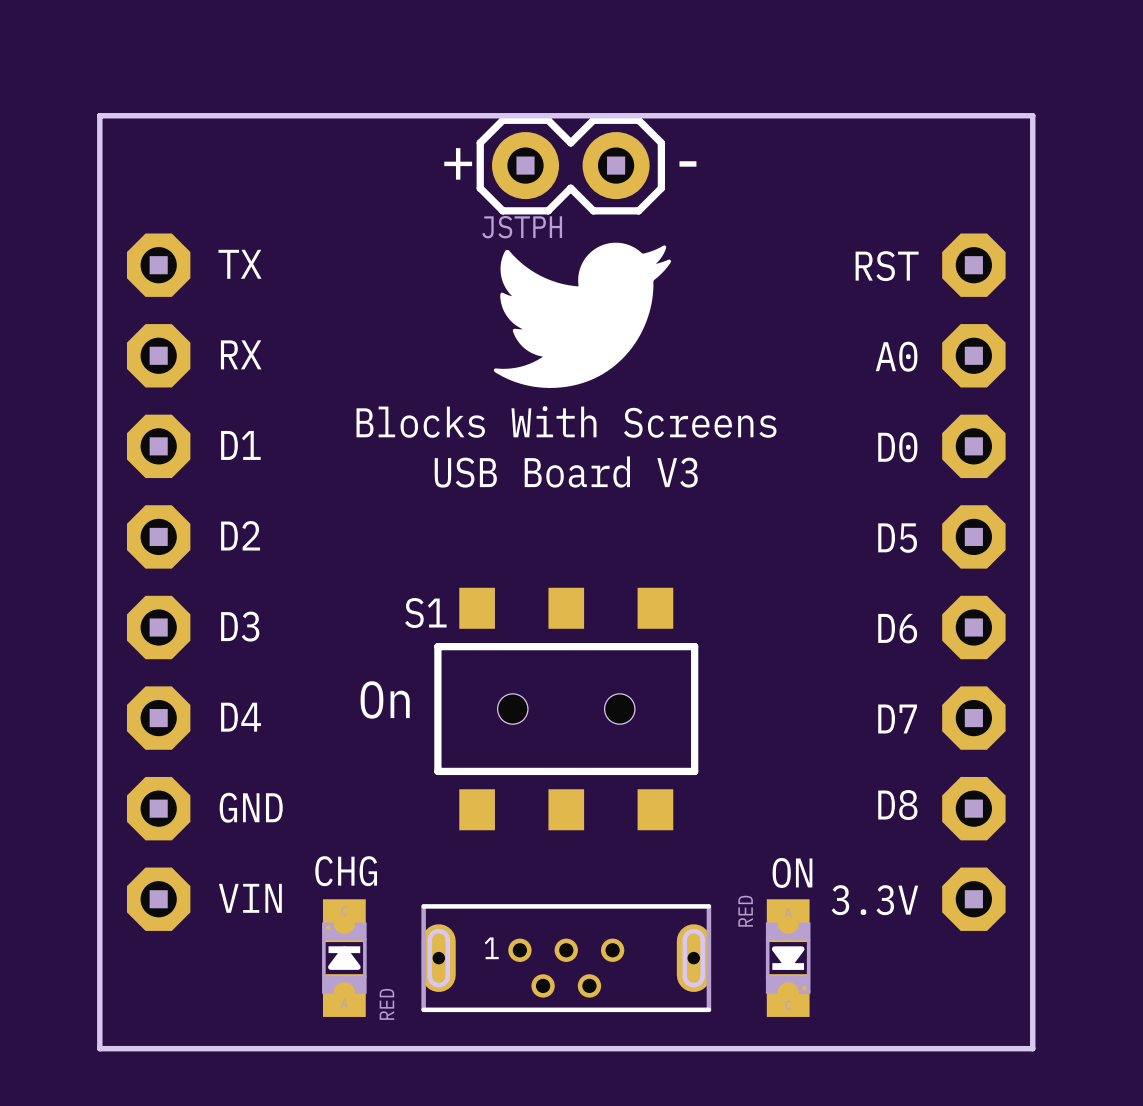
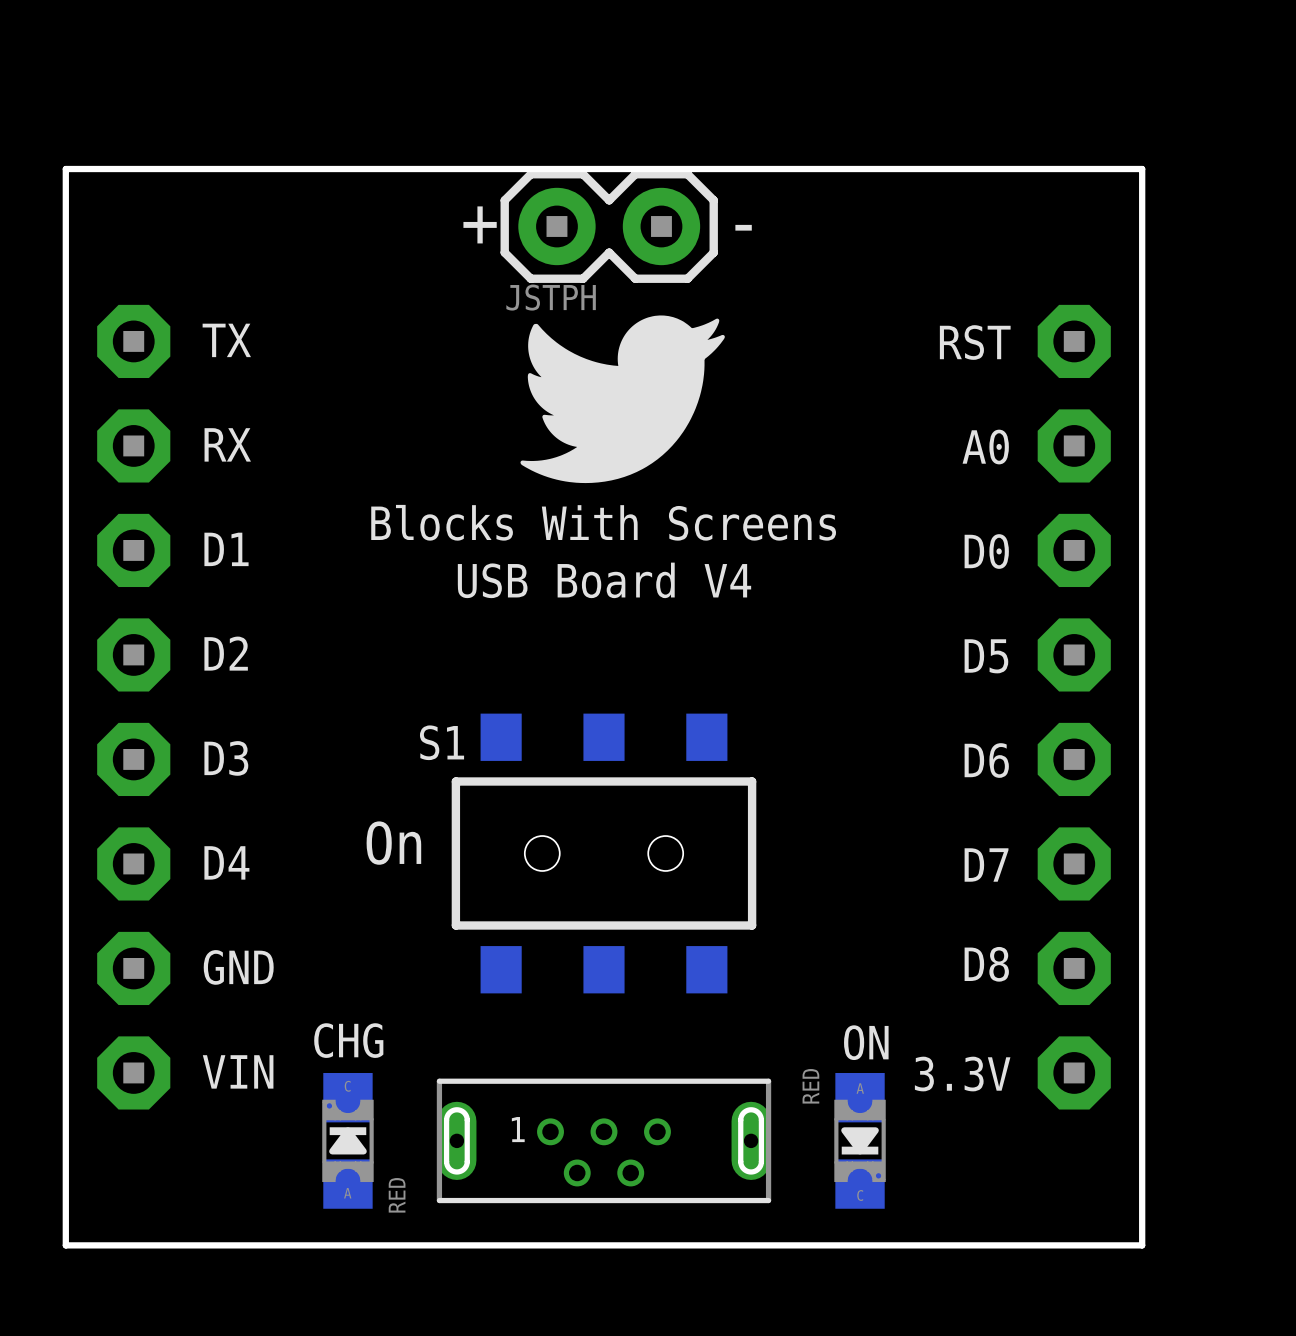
text: USB Board V3 (566, 472) -> USB Board V4 (604, 580)

